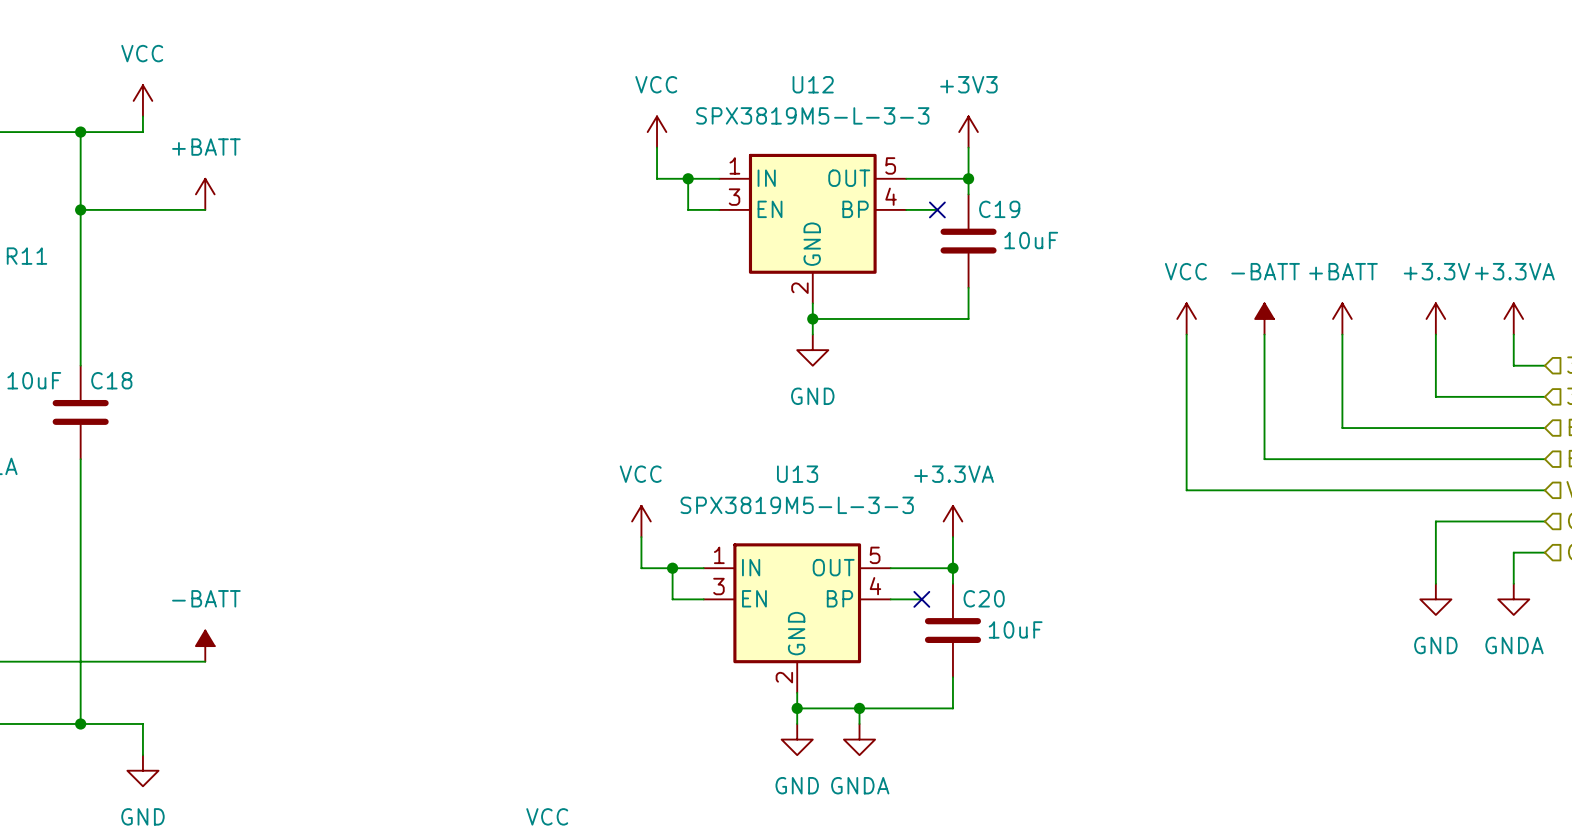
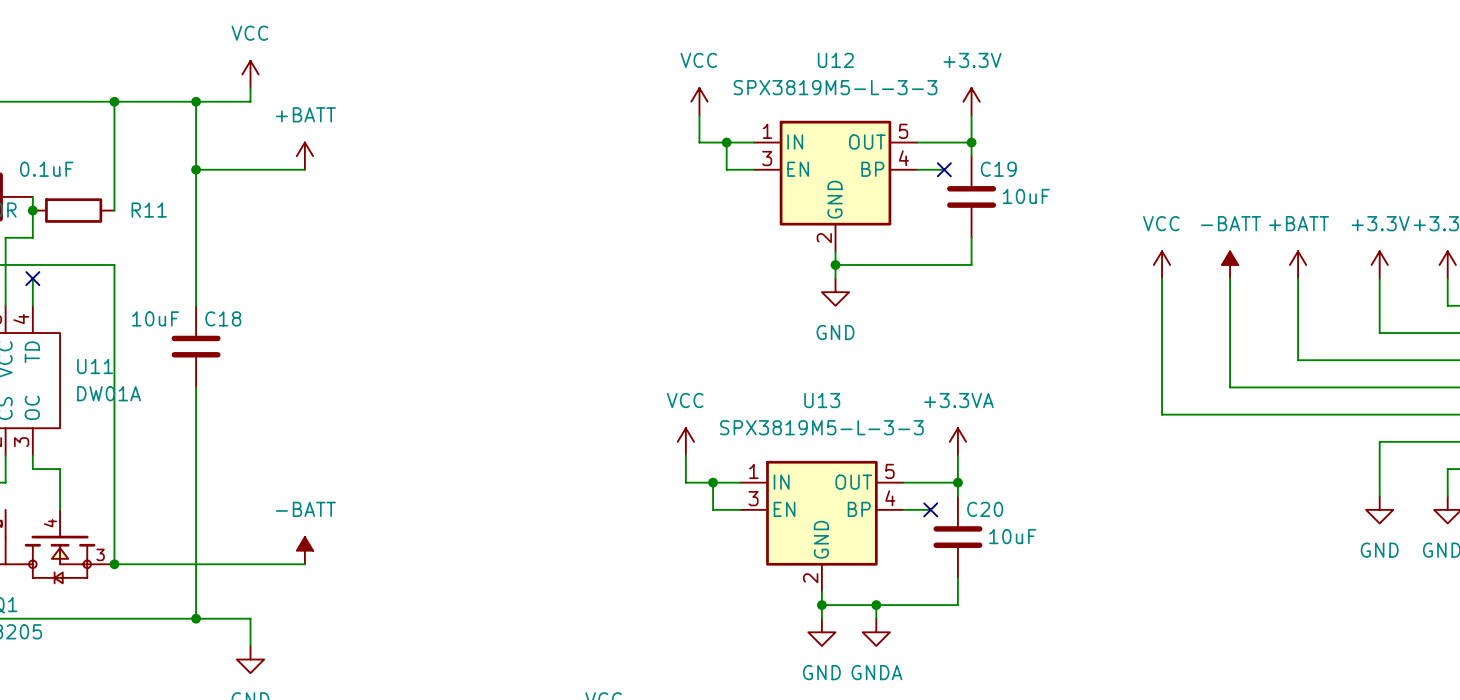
power symbol: +3V3 (968, 132) -> +3.3V (971, 101)

